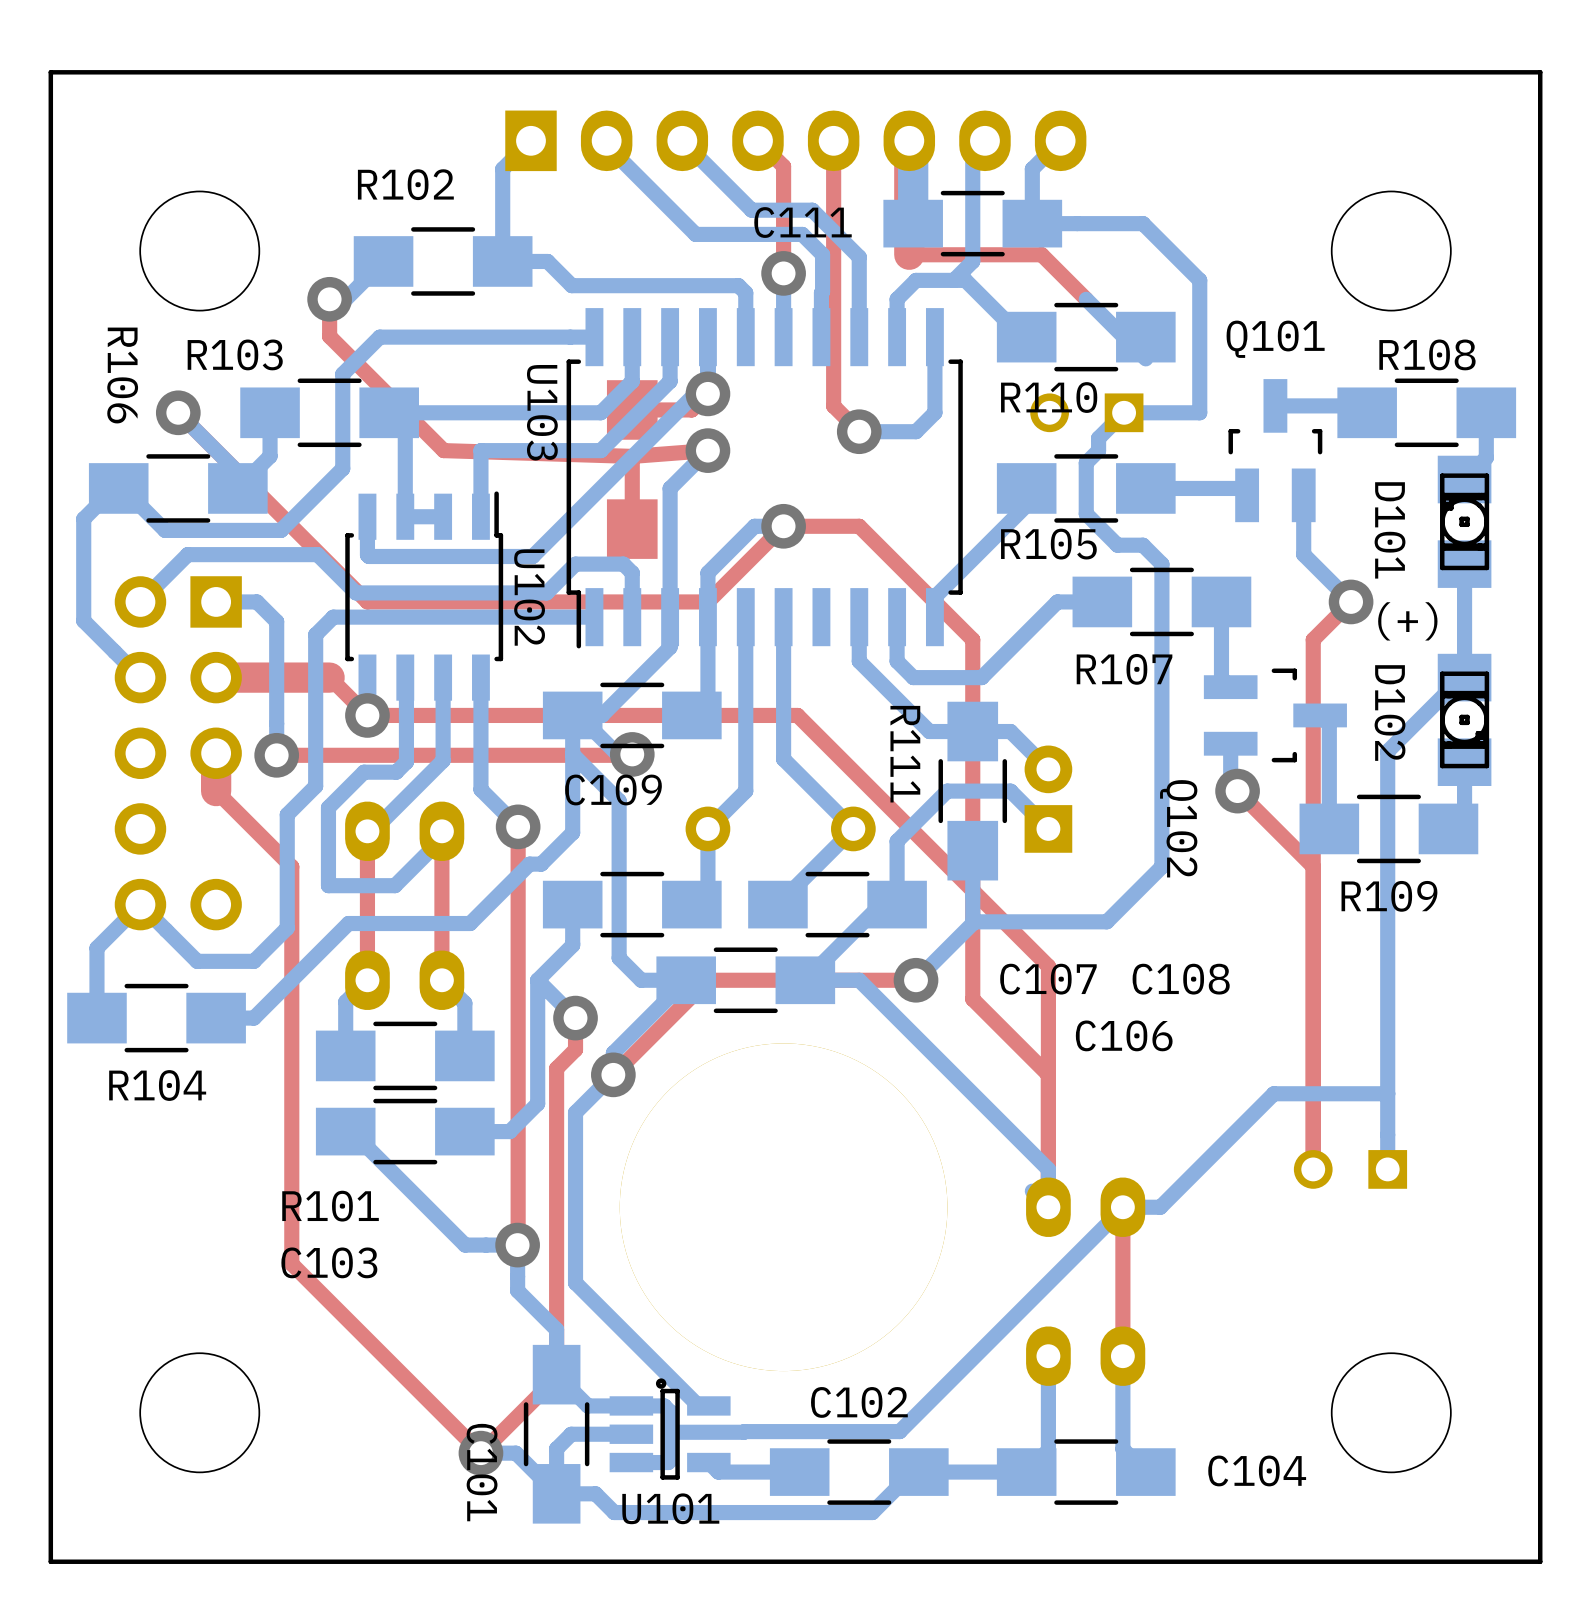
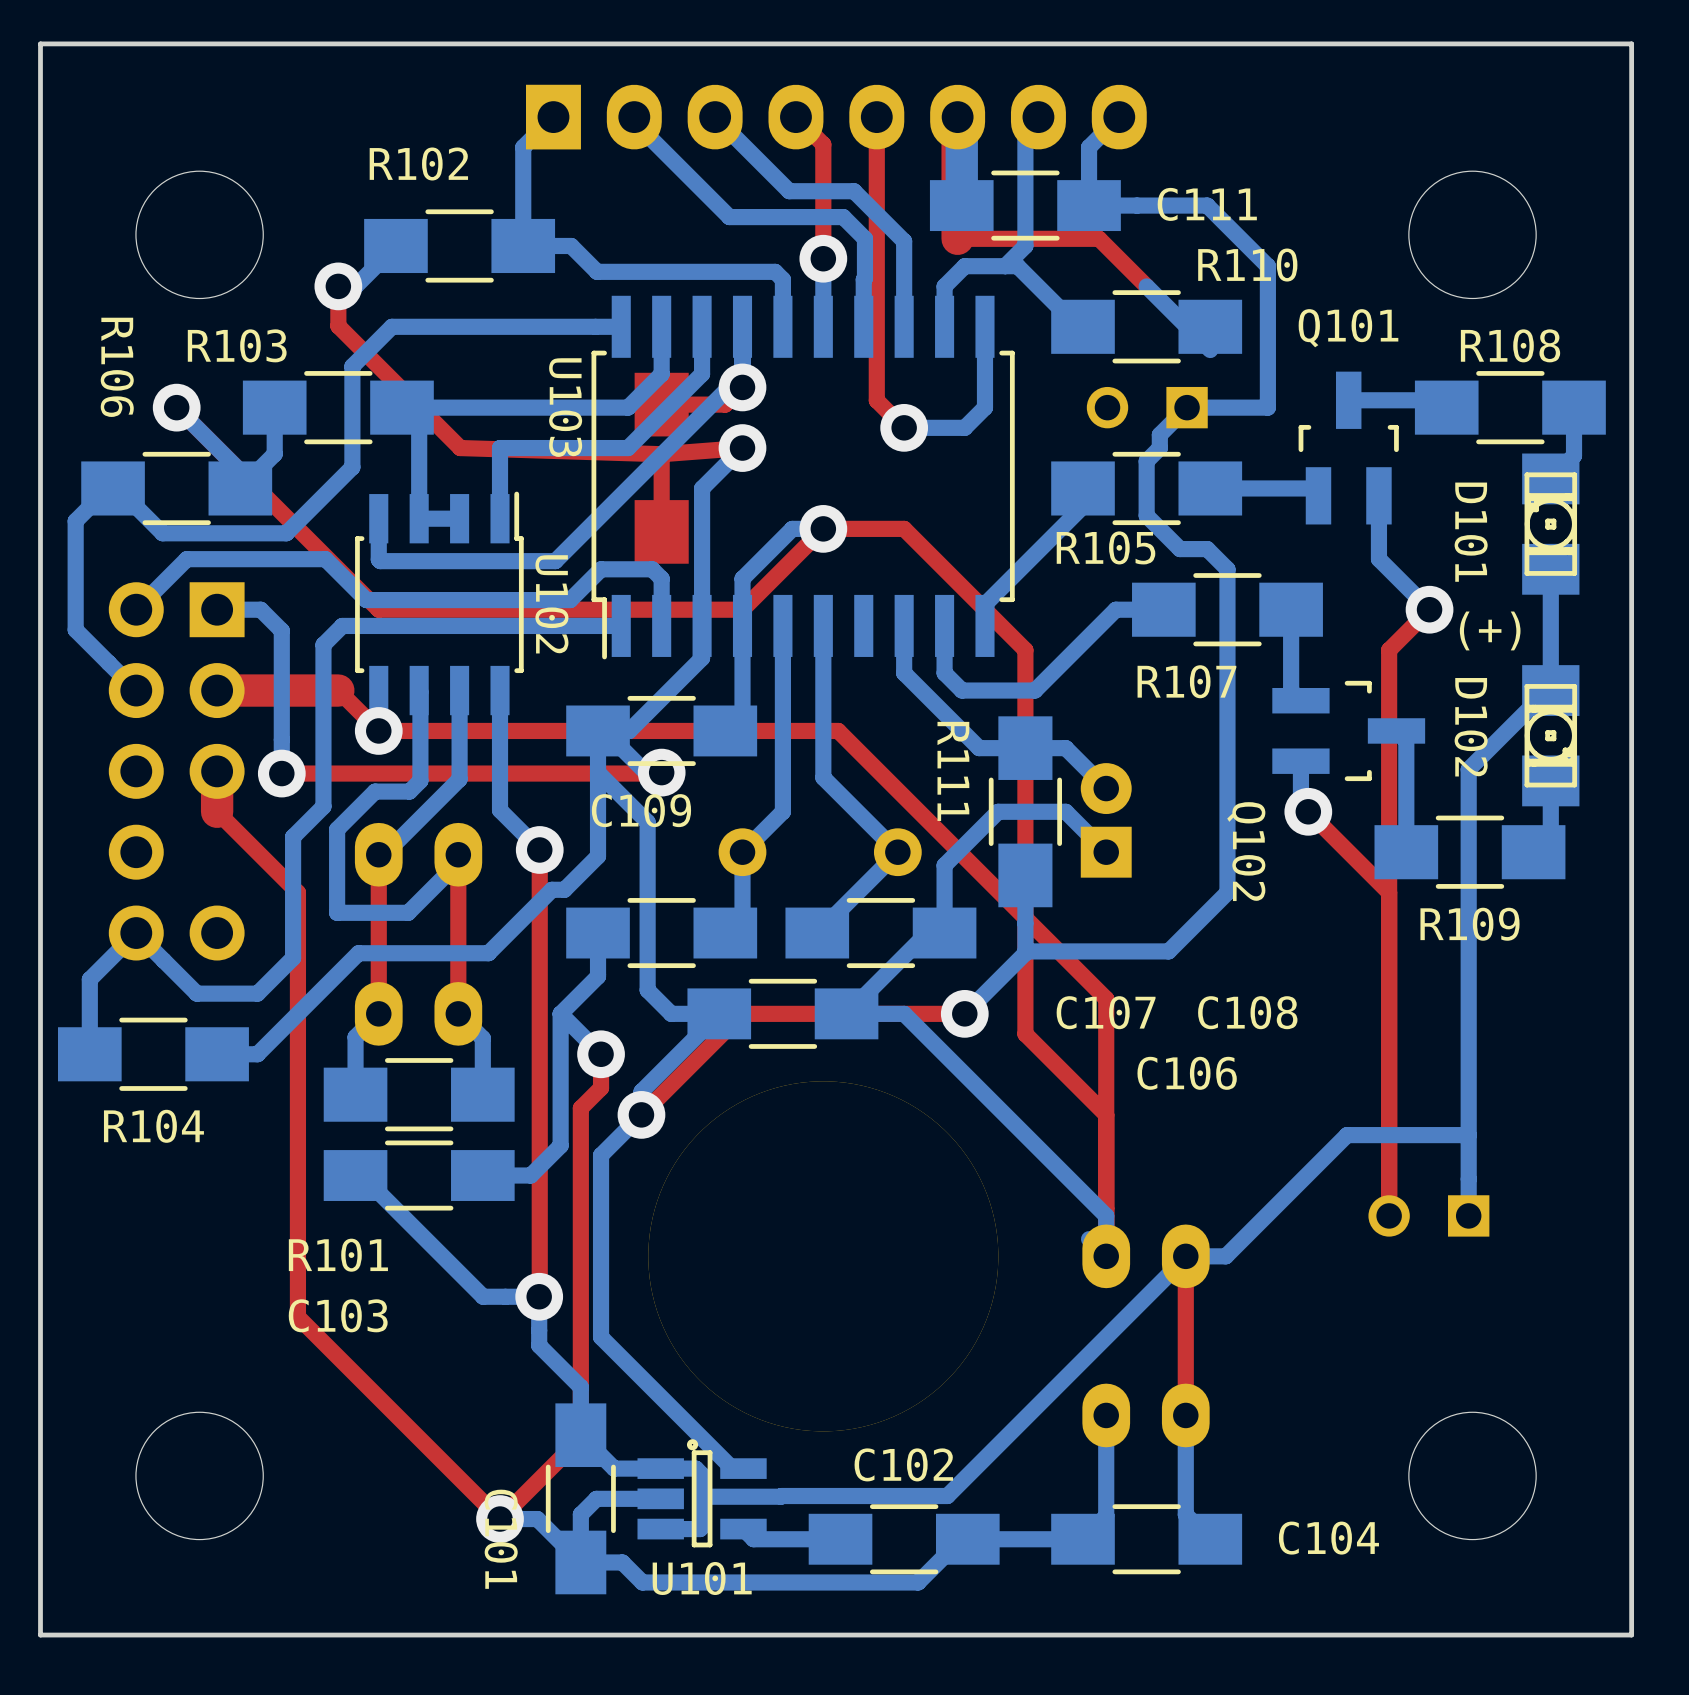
C111 name position: C111 (803, 222) -> C111 (1207, 204)
R110 name position: R110 (1049, 397) -> R110 (1247, 265)

